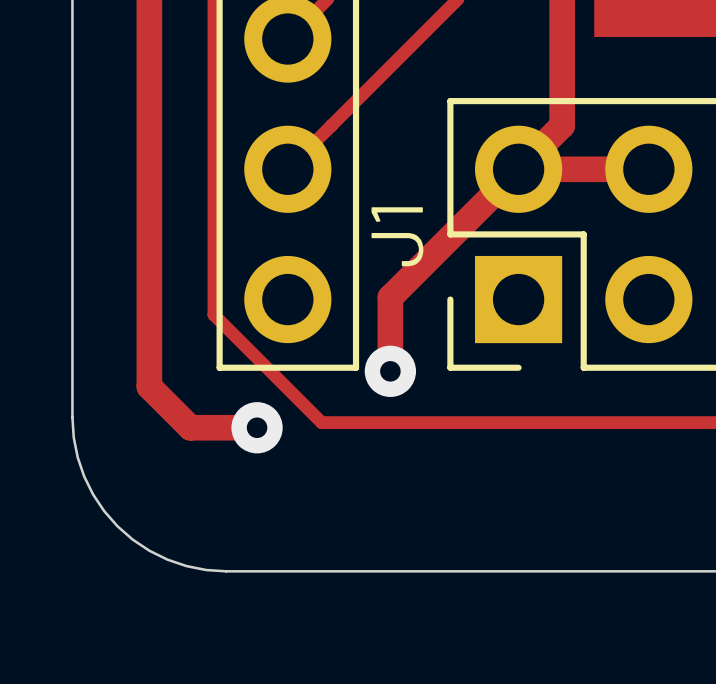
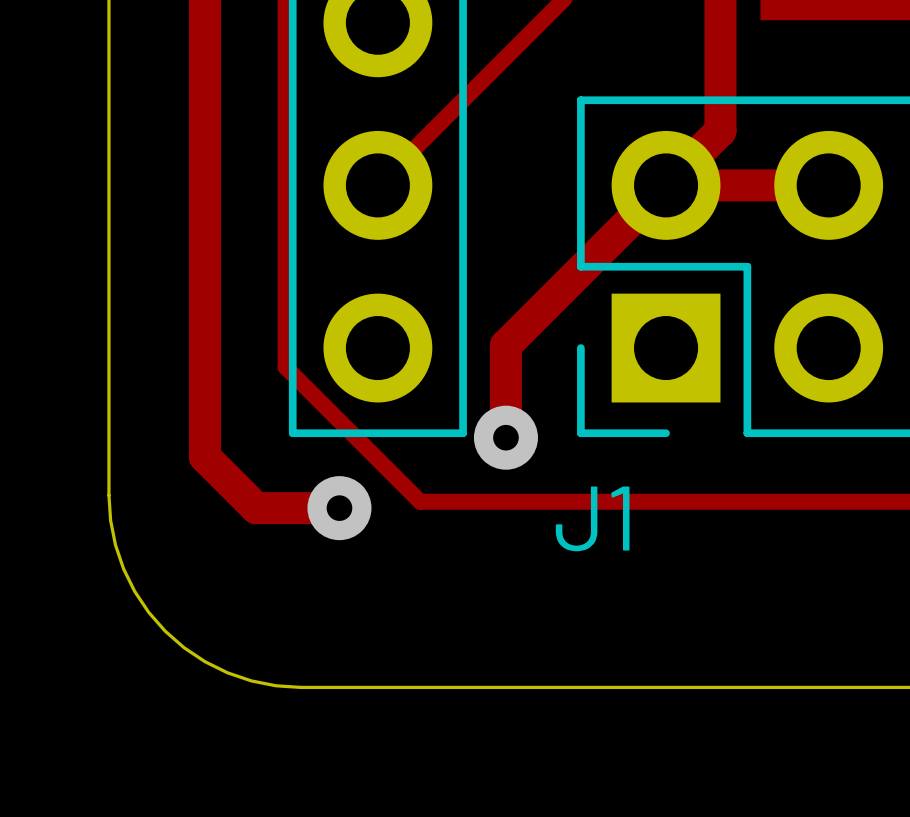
J1 name rotation: 0° (397, 236) -> 90° clockwise (592, 518)
J1 name position: J1 (397, 236) -> J1 (592, 518)

